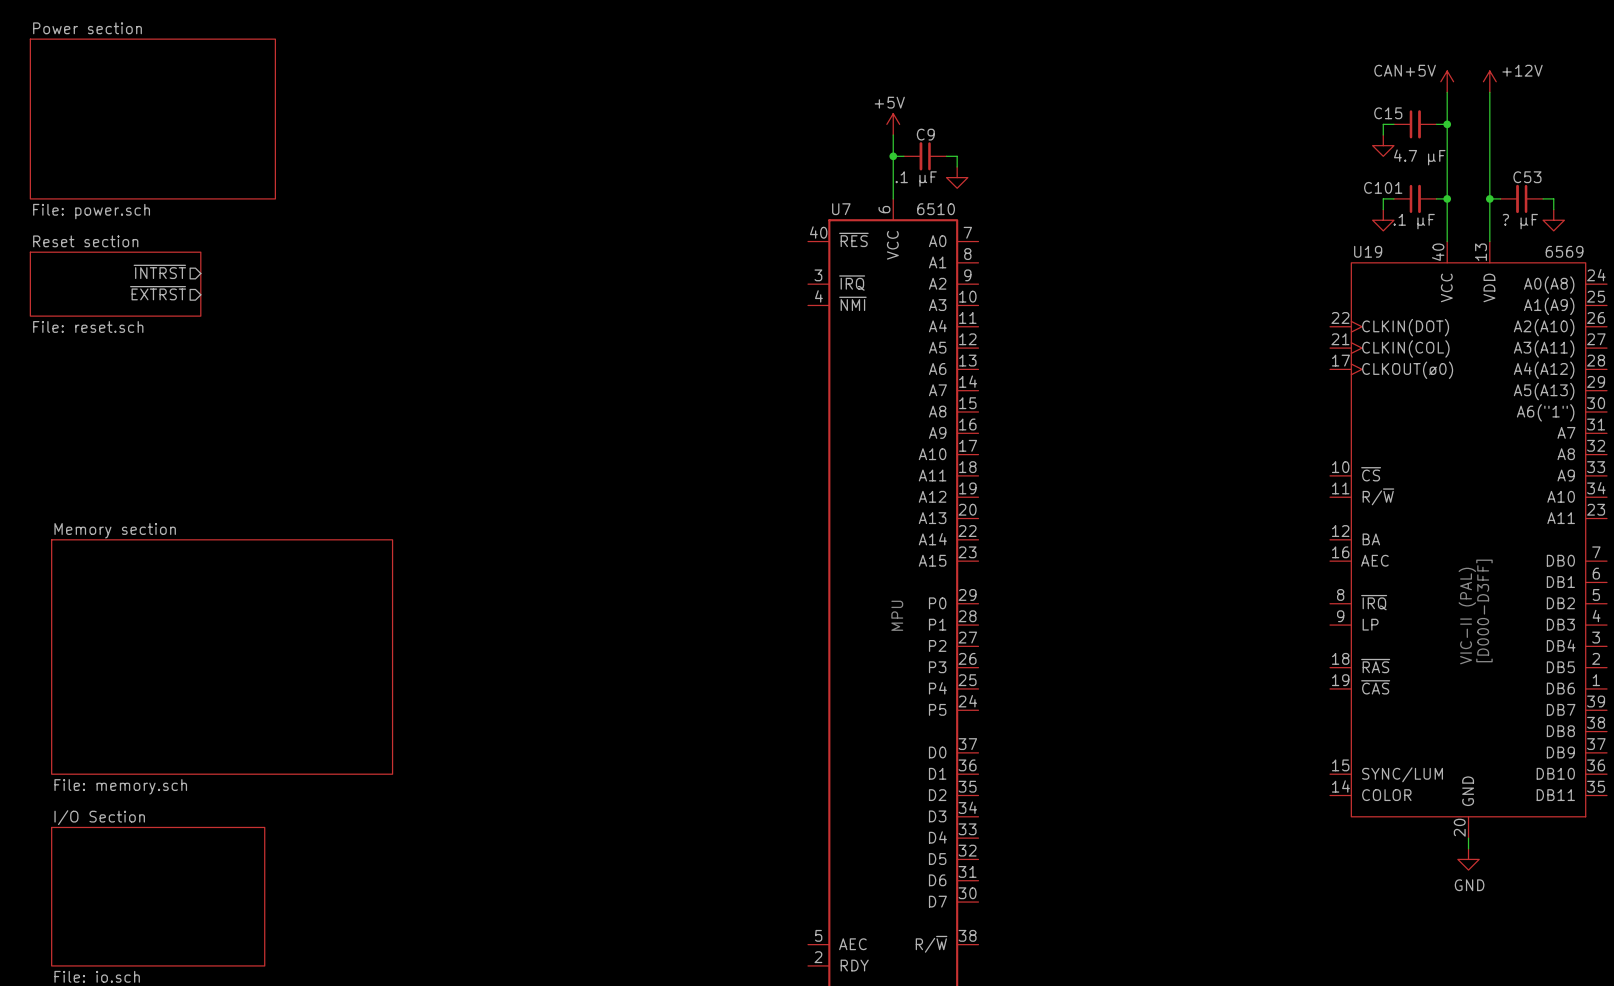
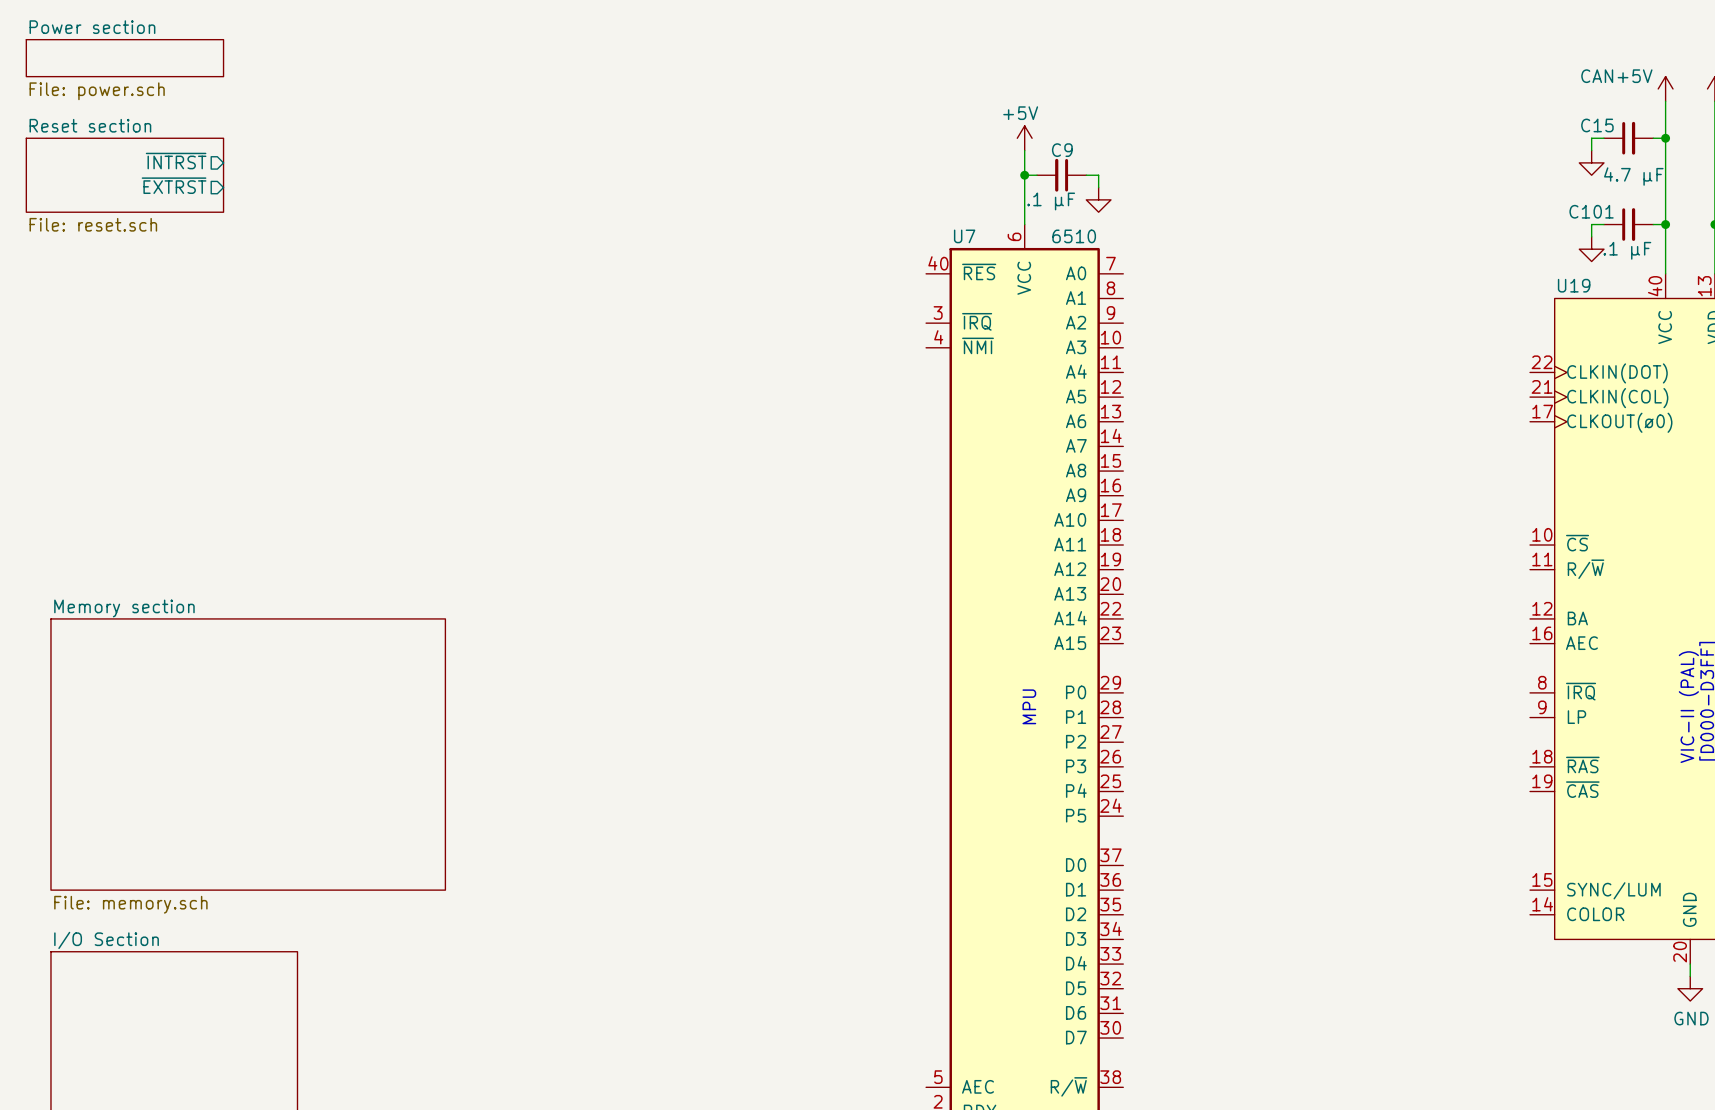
sheet Power section: none -> File: power.sch (124, 58)
sheet Power section: File: power.sch (152, 119) -> none
sheet pin position: ~{INTRST} (159, 271) -> ~{INTRST} (176, 161)
sheet Reset section position: (115, 284) -> (124, 175)
sheet pin position: ~{EXTRST} (158, 293) -> ~{EXTRST} (174, 185)

